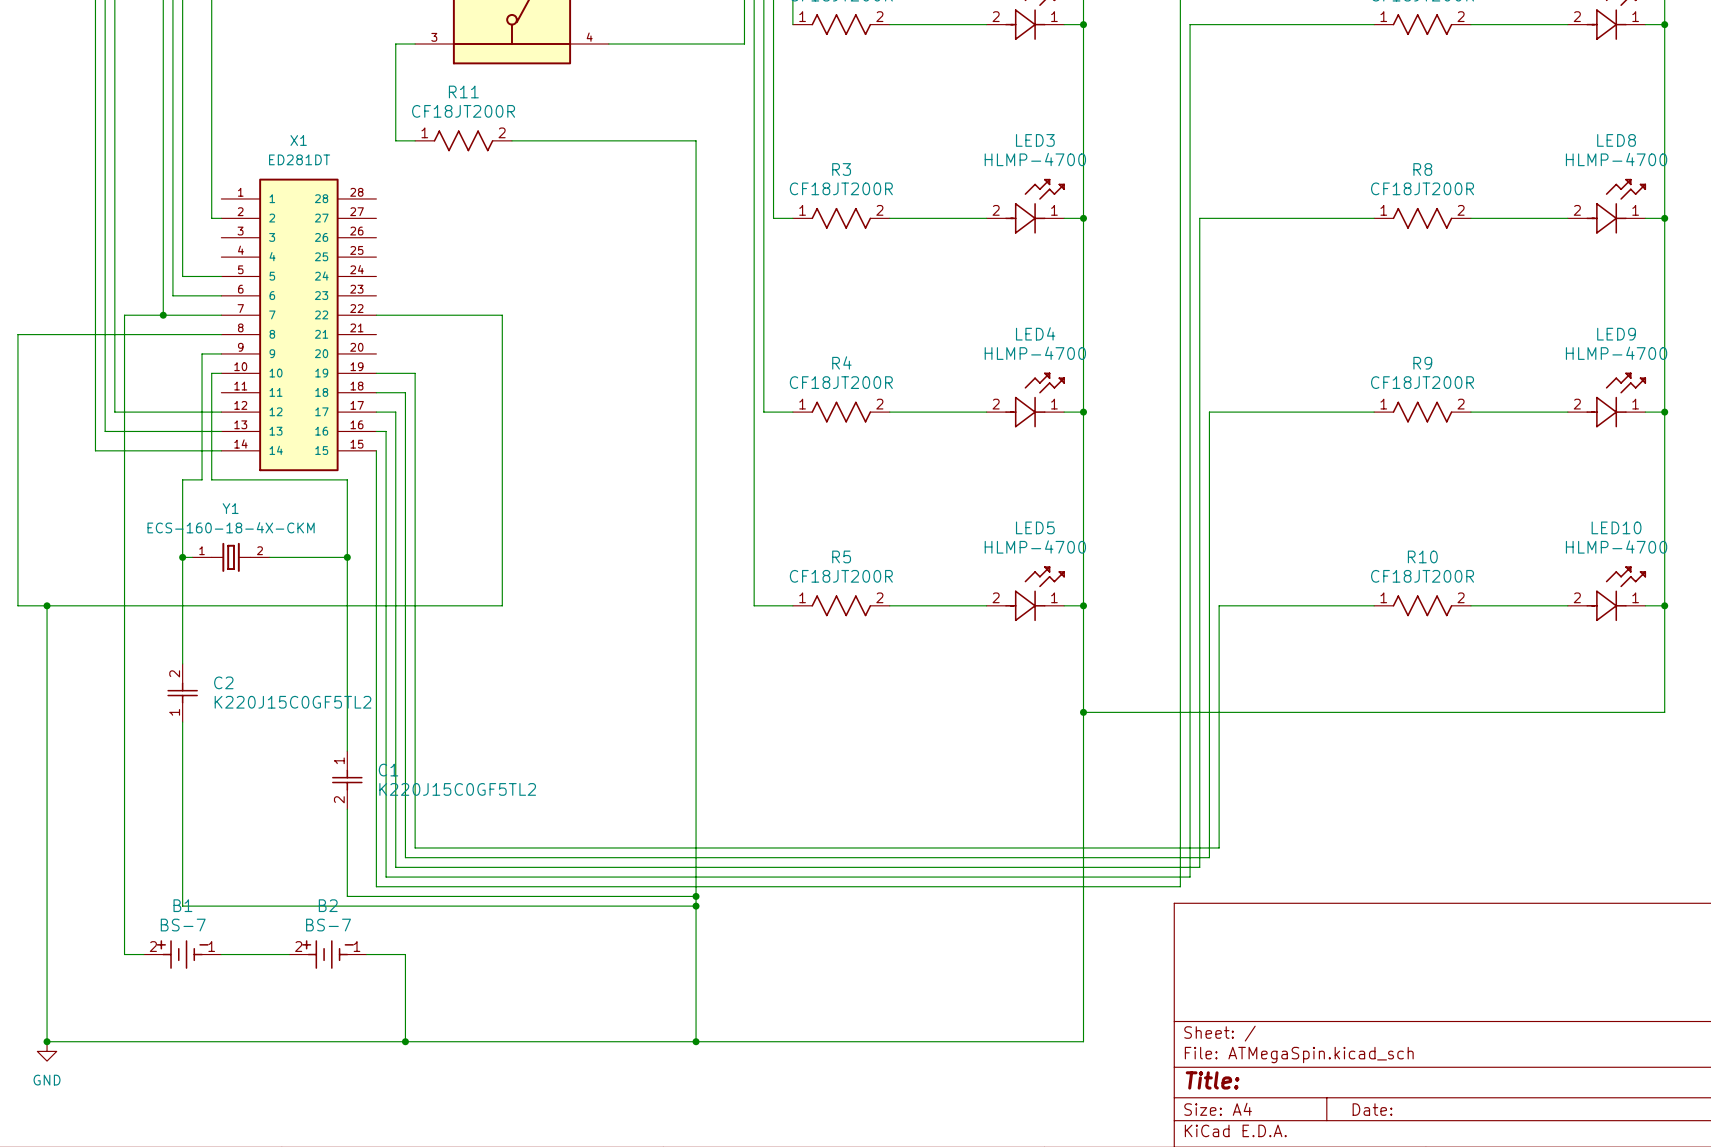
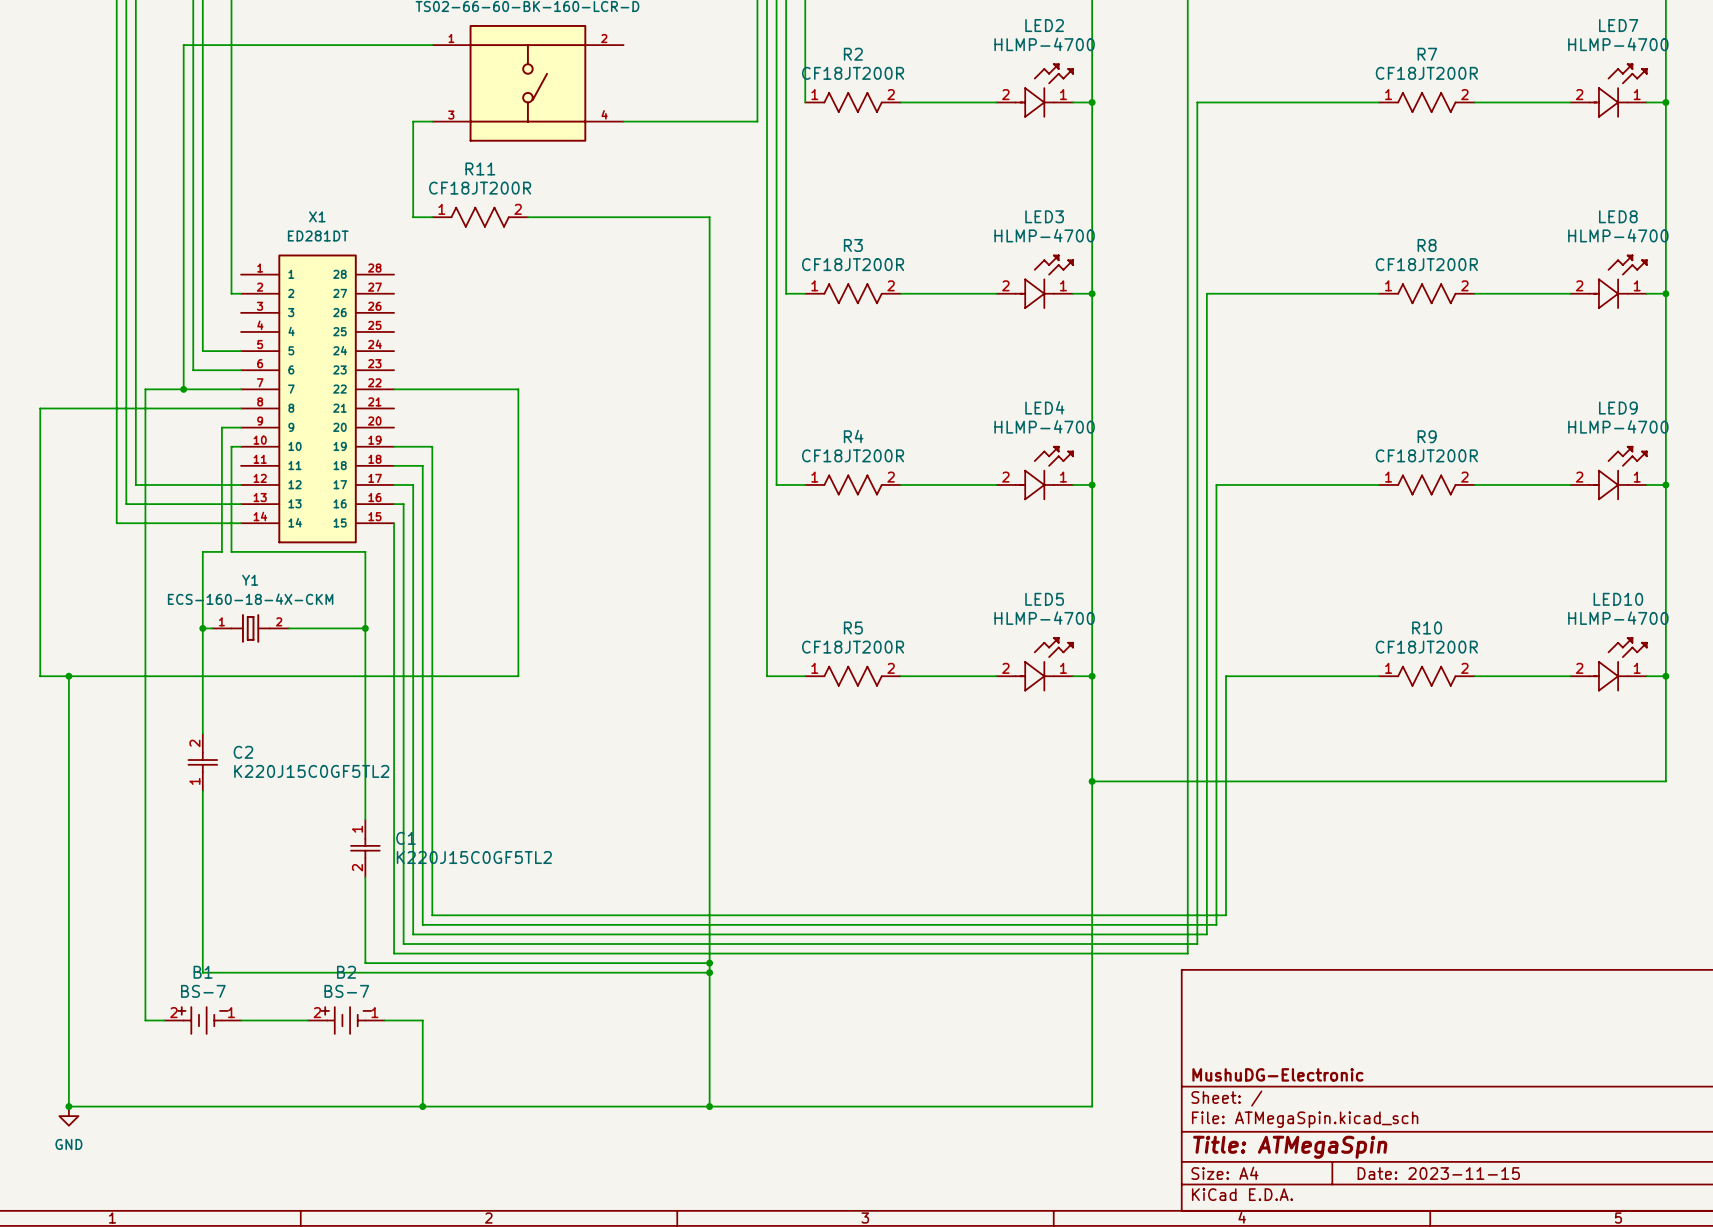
title block: none -> MushuDG-Electronic (1277, 1074)
title block: Title: (1212, 1080) -> Title: ATMegaSpin (1290, 1147)
title block: Date: (1372, 1109) -> Date: 2023-11-15 (1438, 1173)

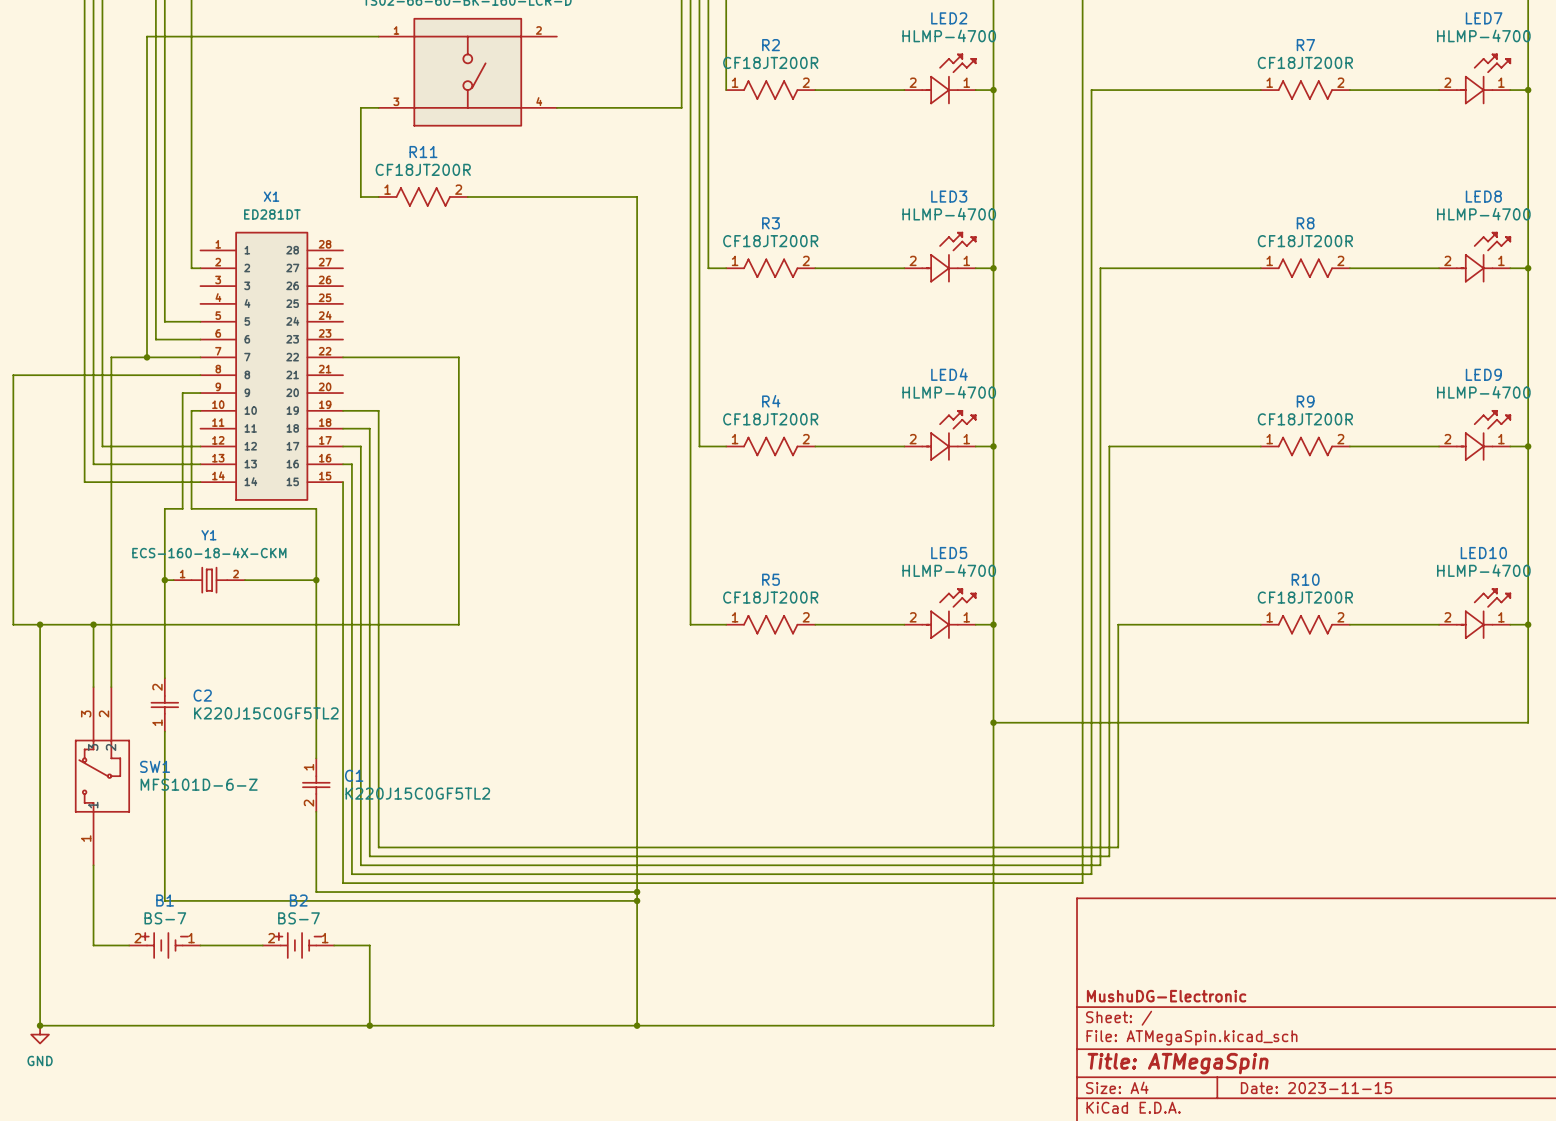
wire: none -> (93, 624) (93, 687)
junction: none -> (93, 624)
wire: (145, 743) (145, 1020) -> (93, 865) (93, 945) (111, 945)
SW1: none -> MFS101D-6-Z (102, 776)

